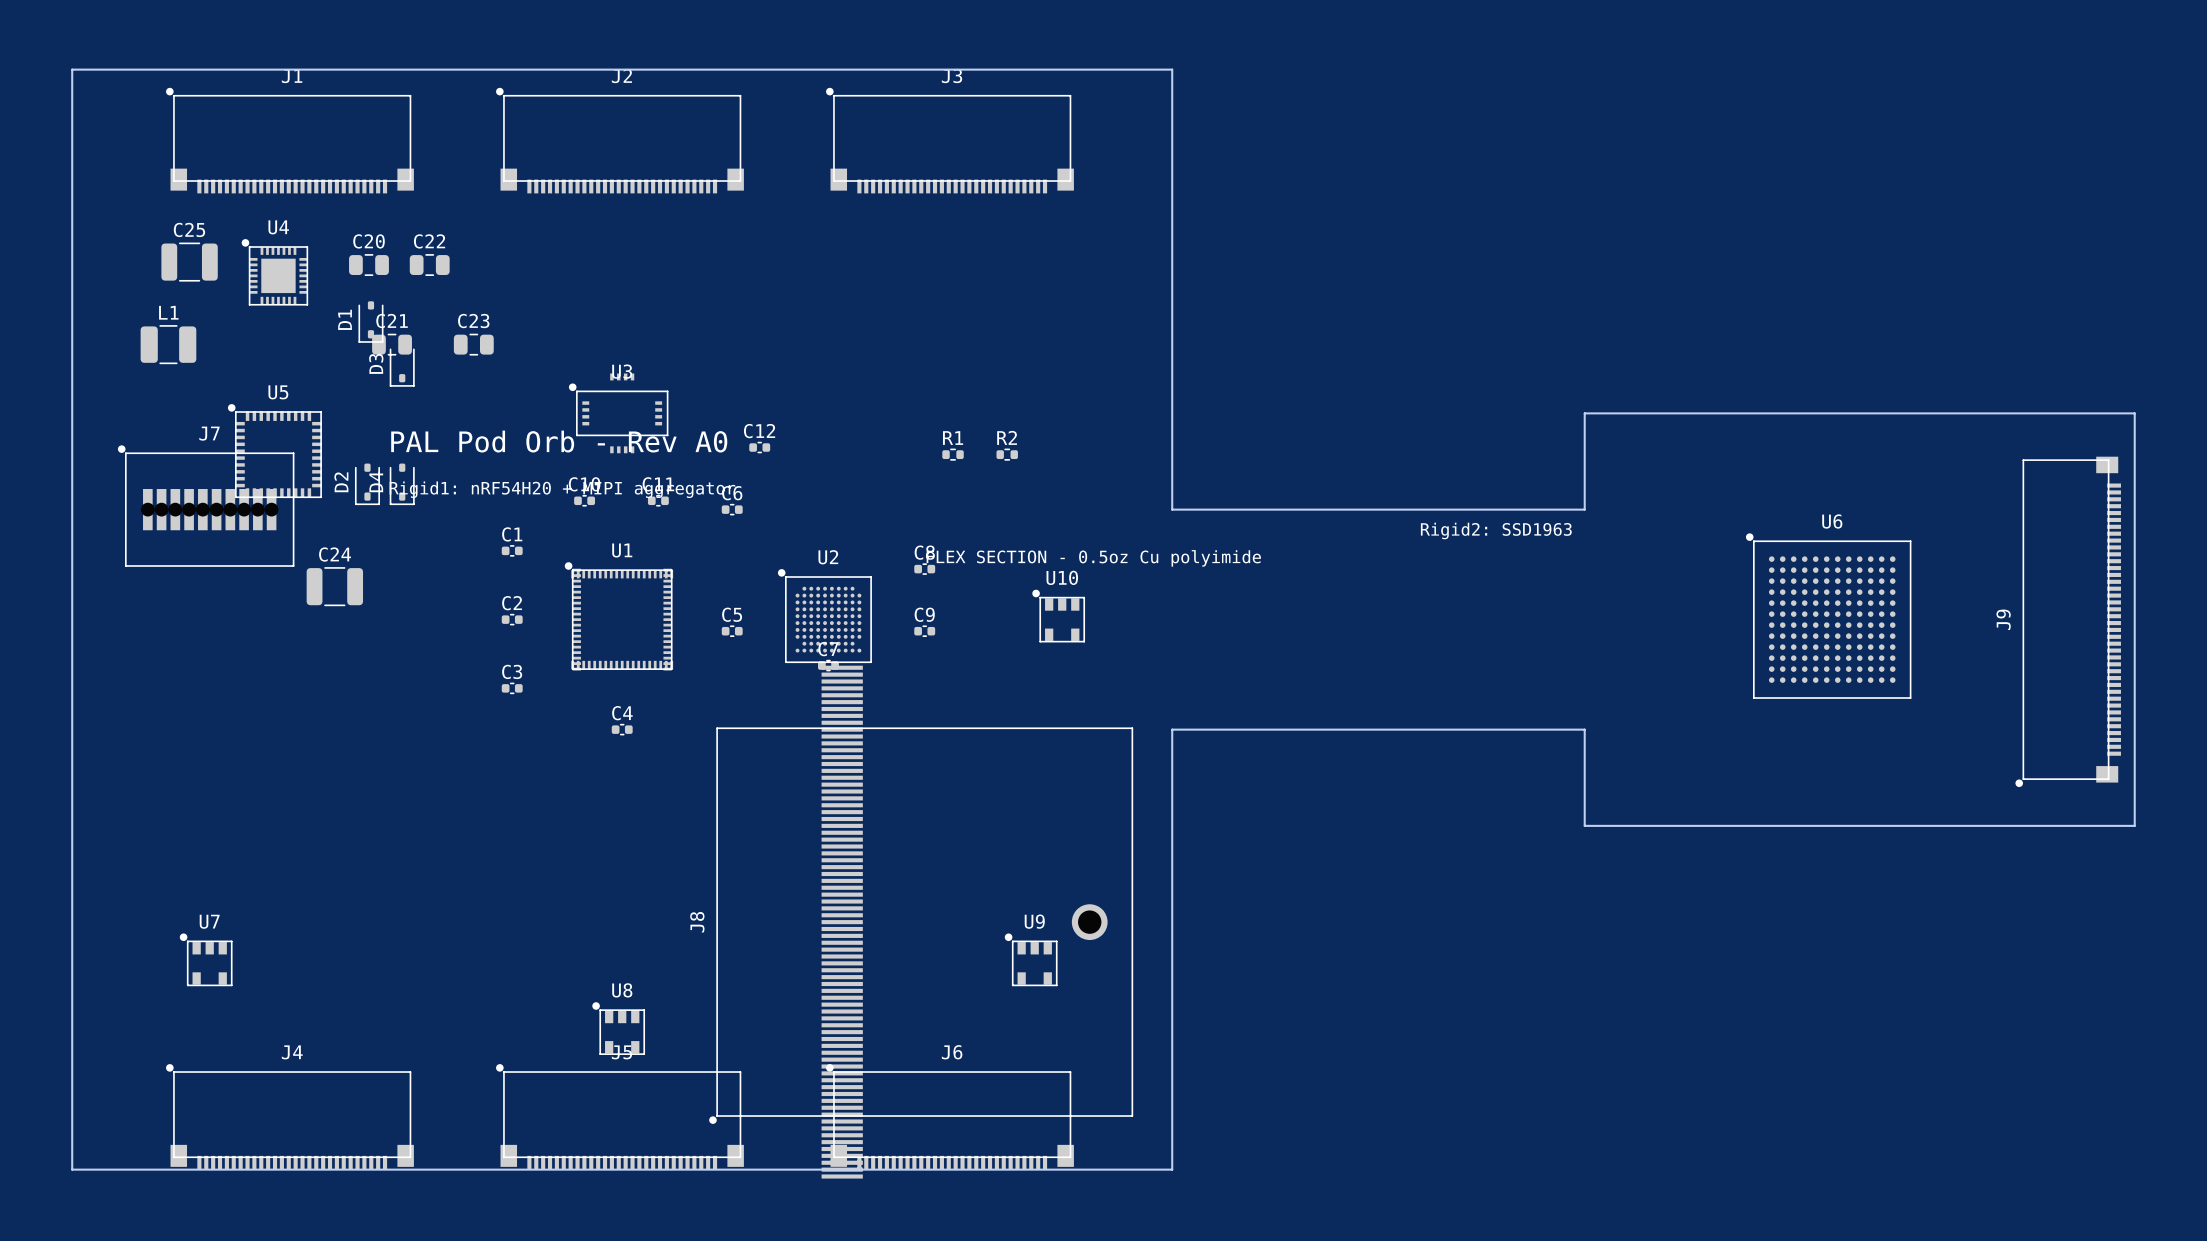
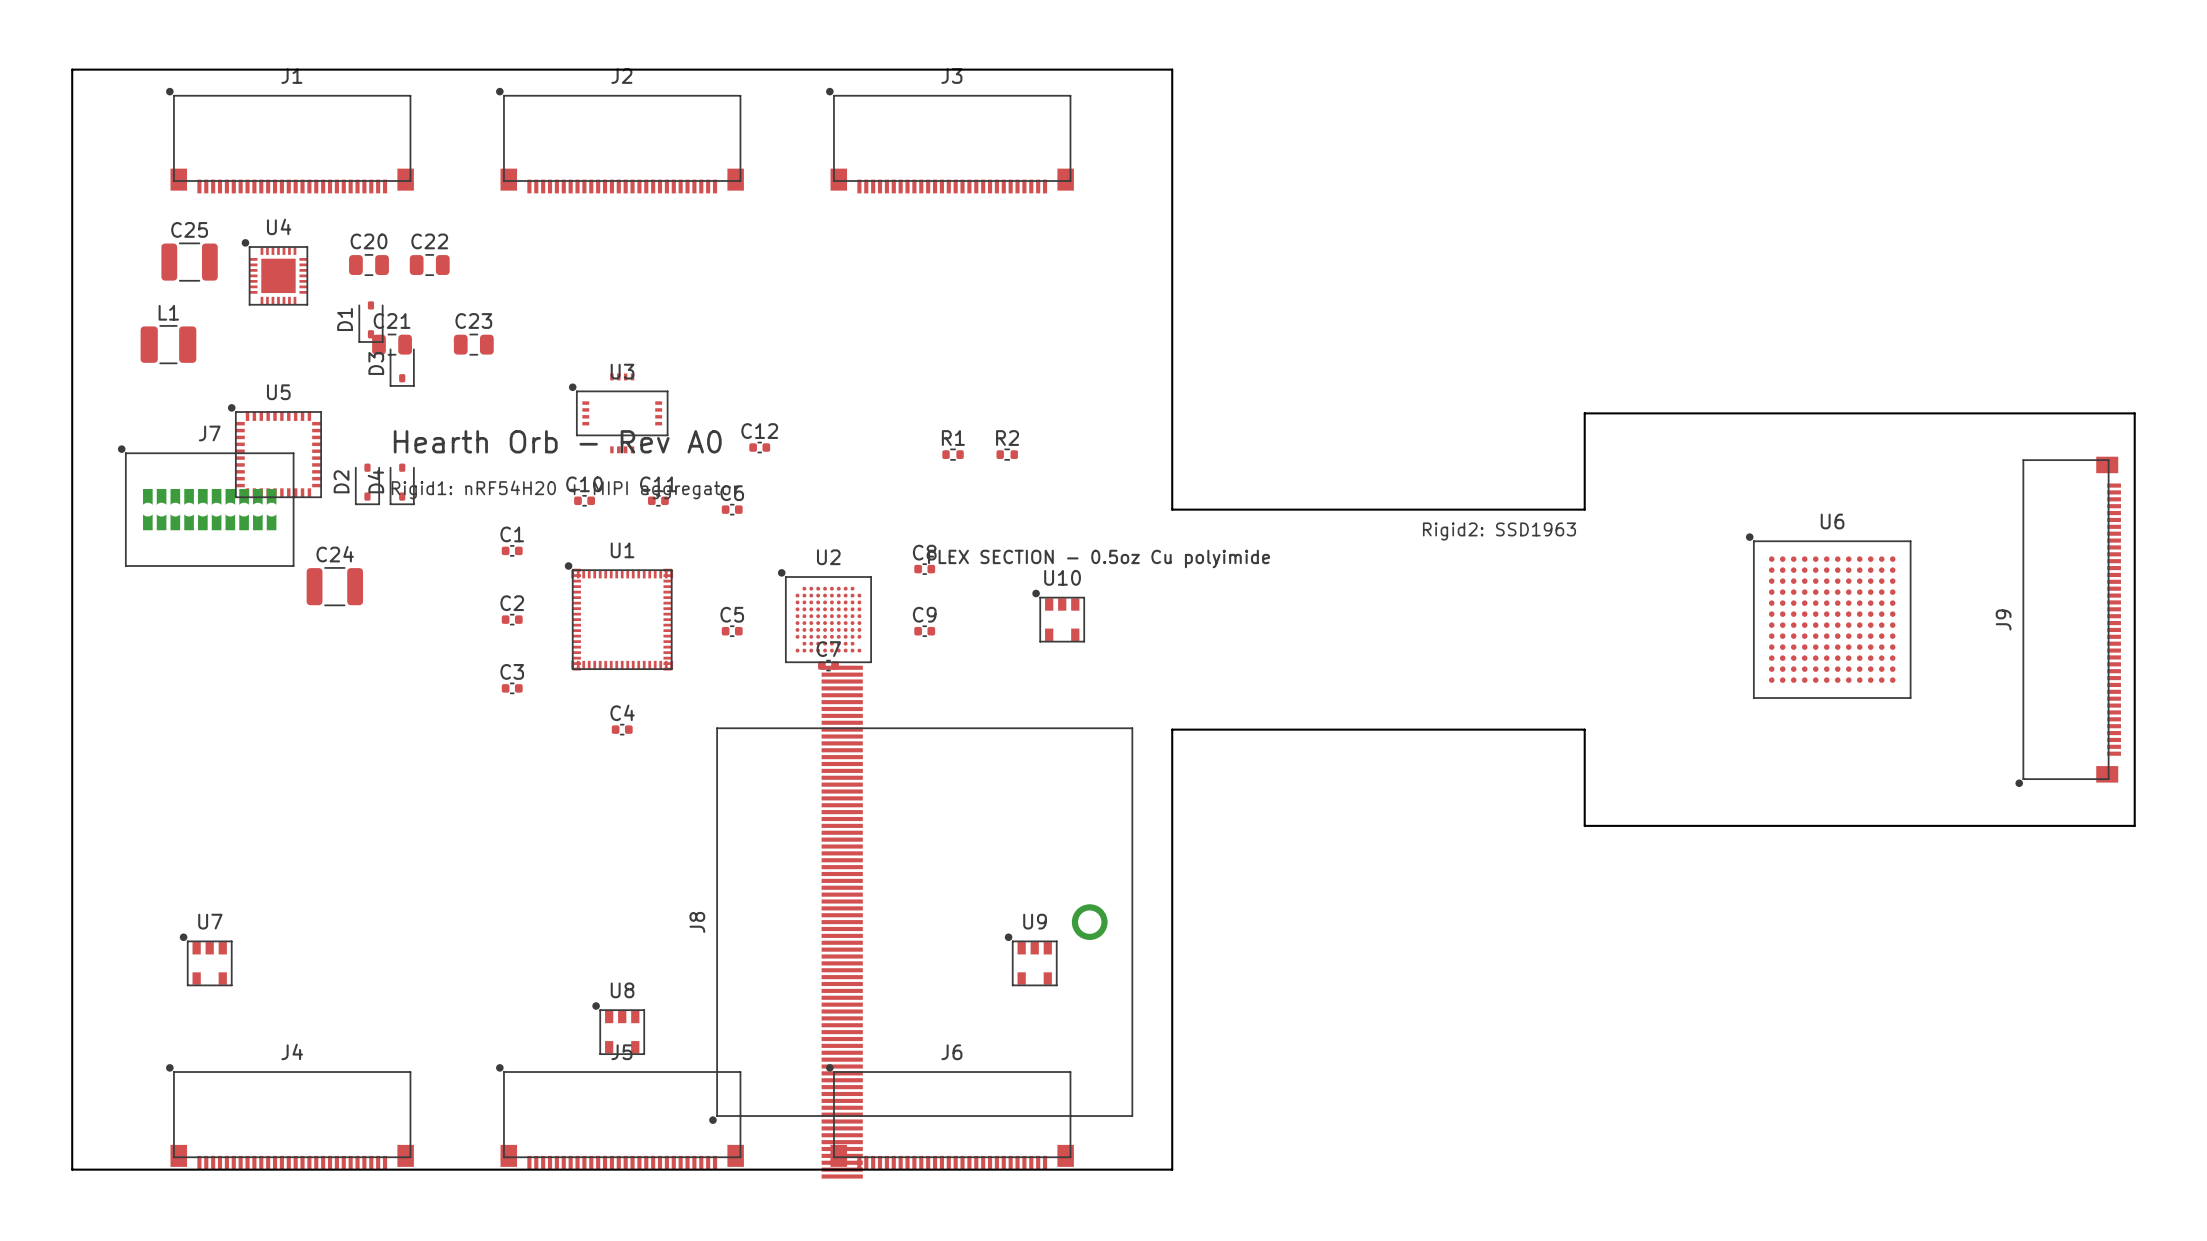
text: PAL Pod Orb - Rev A0 (559, 441) -> Hearth Orb - Rev A0 (557, 441)

